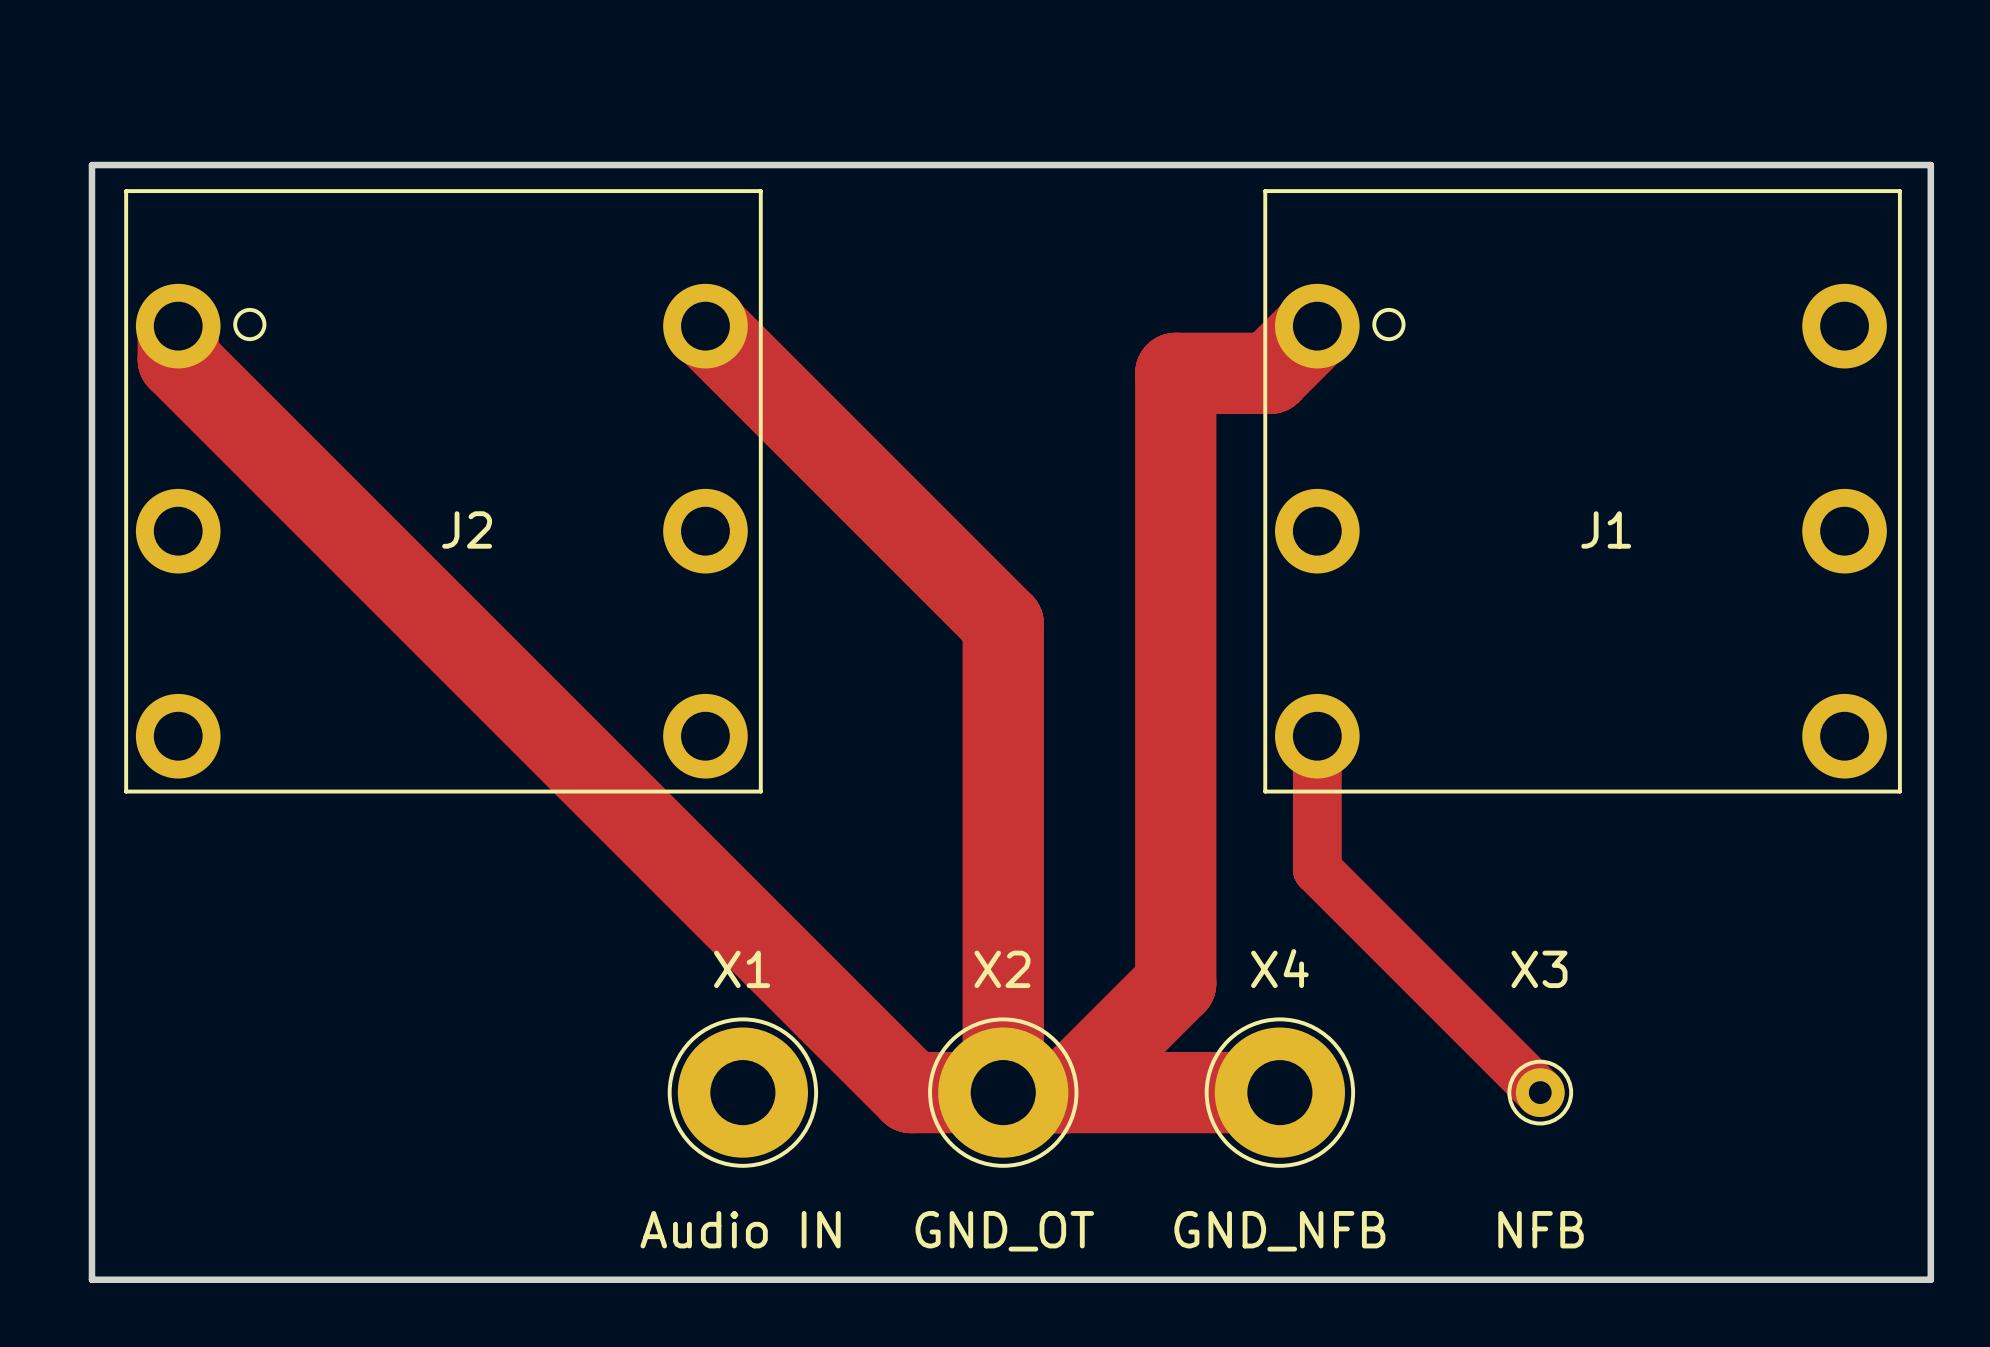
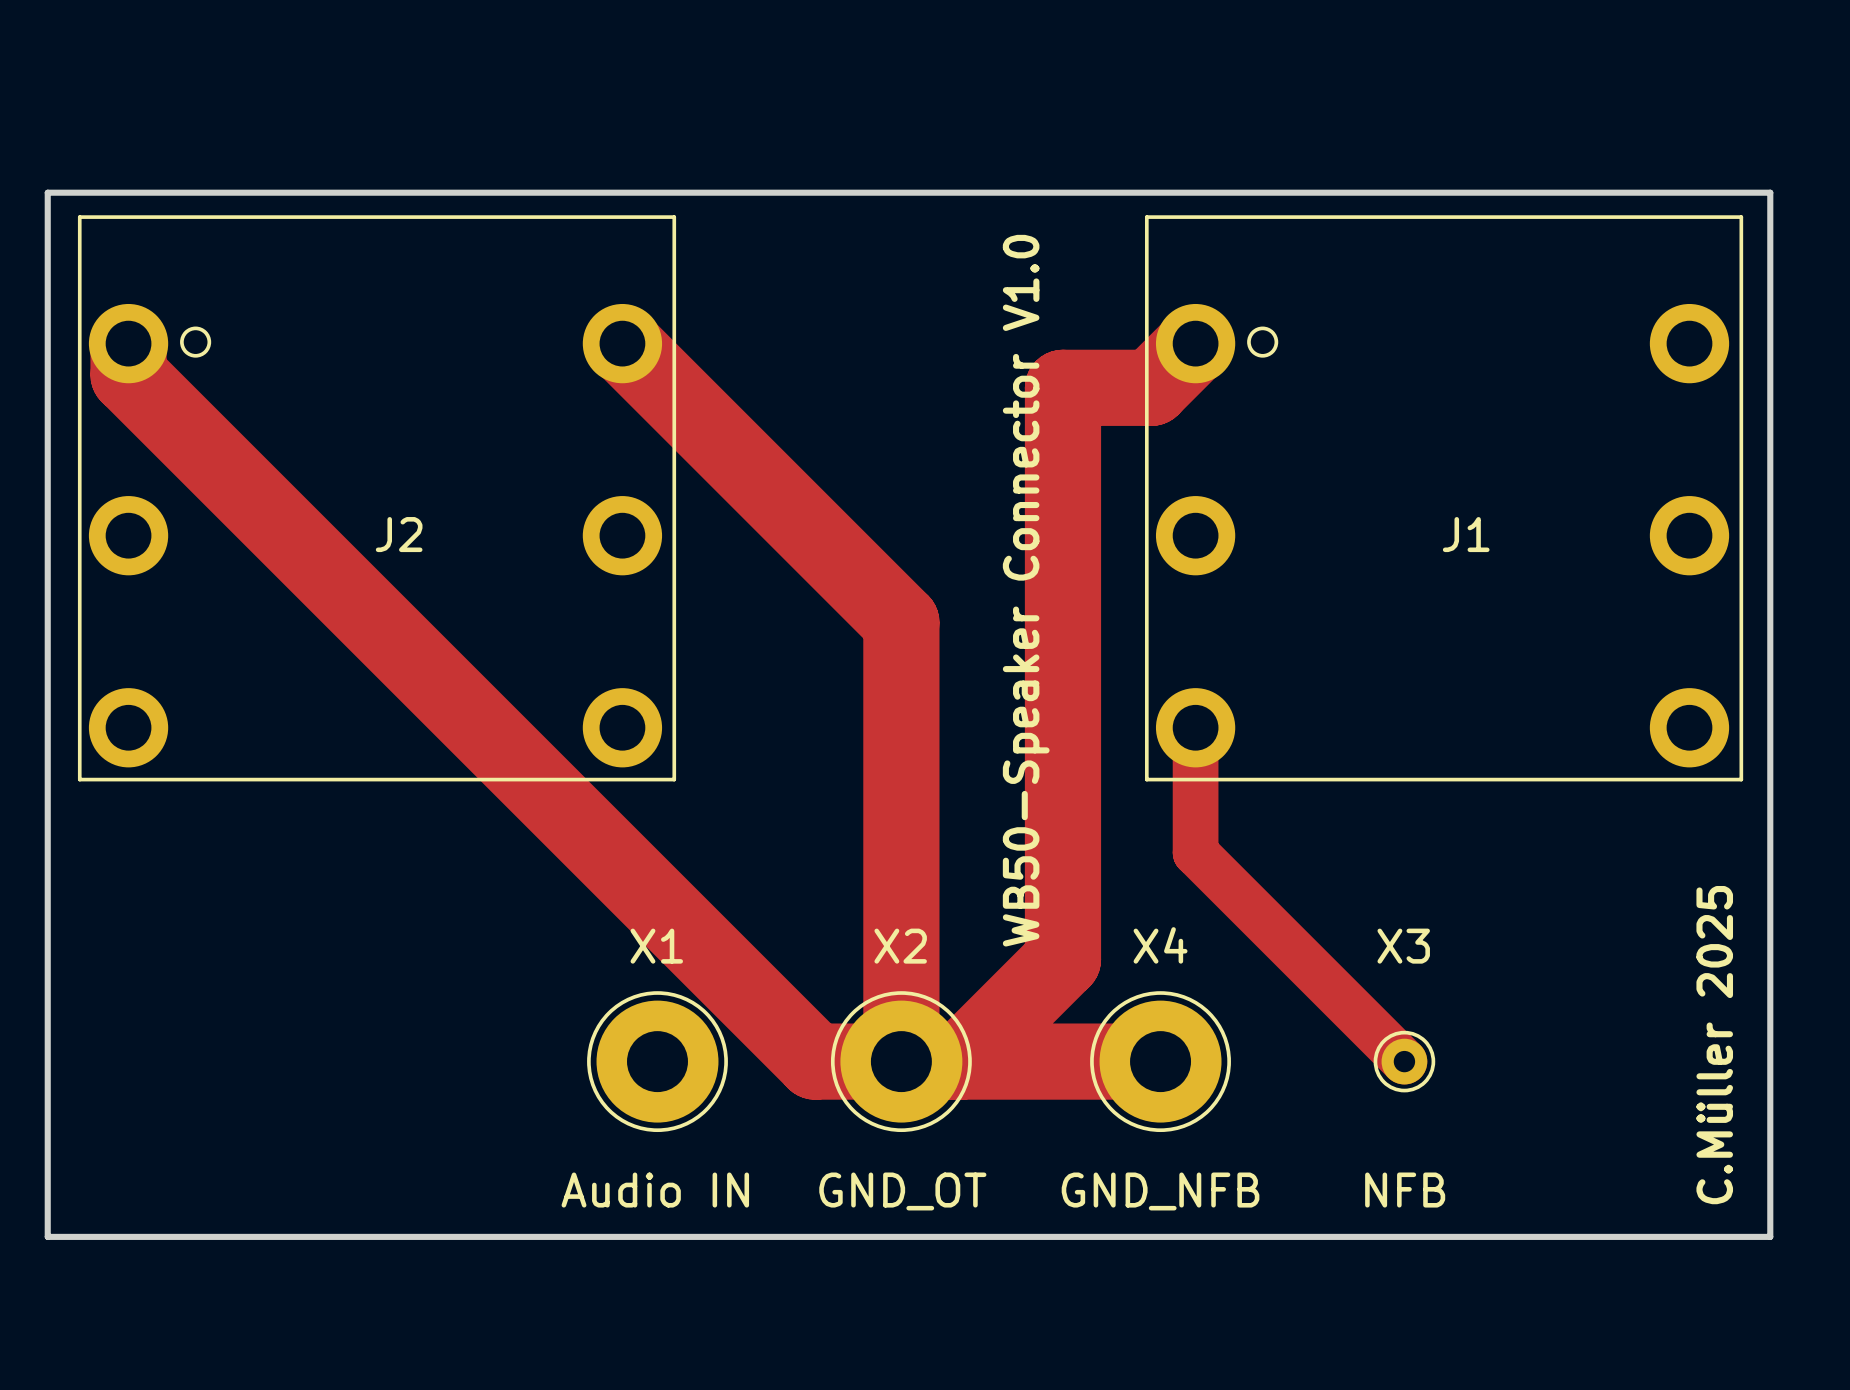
text: none -> WB50-Speaker Connector V1.0 (1026, 590)
text: none -> C.Müller 2025 (1714, 1045)

